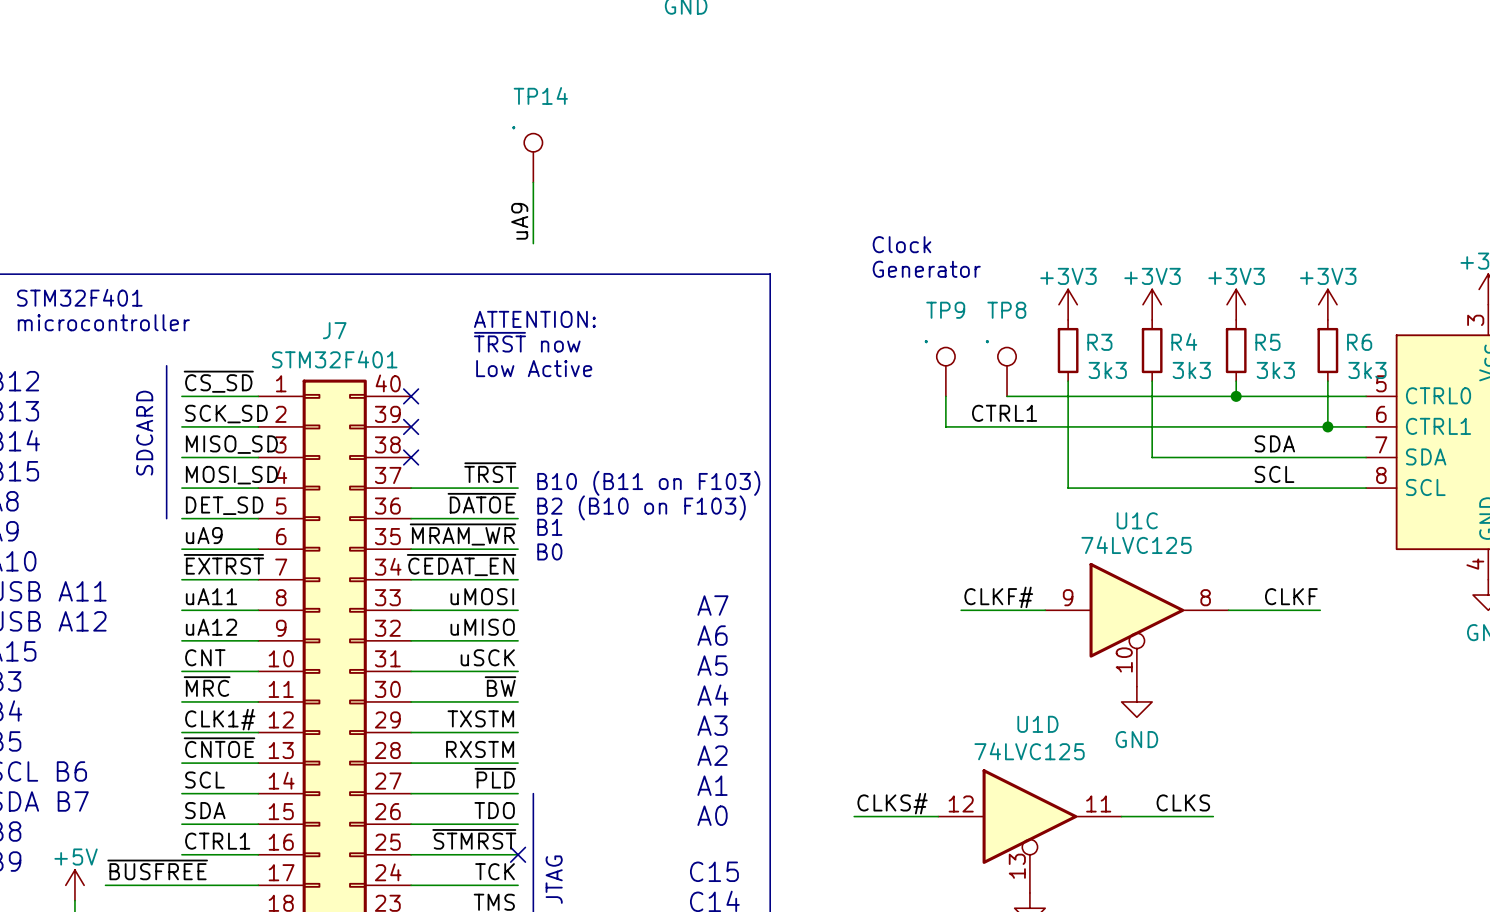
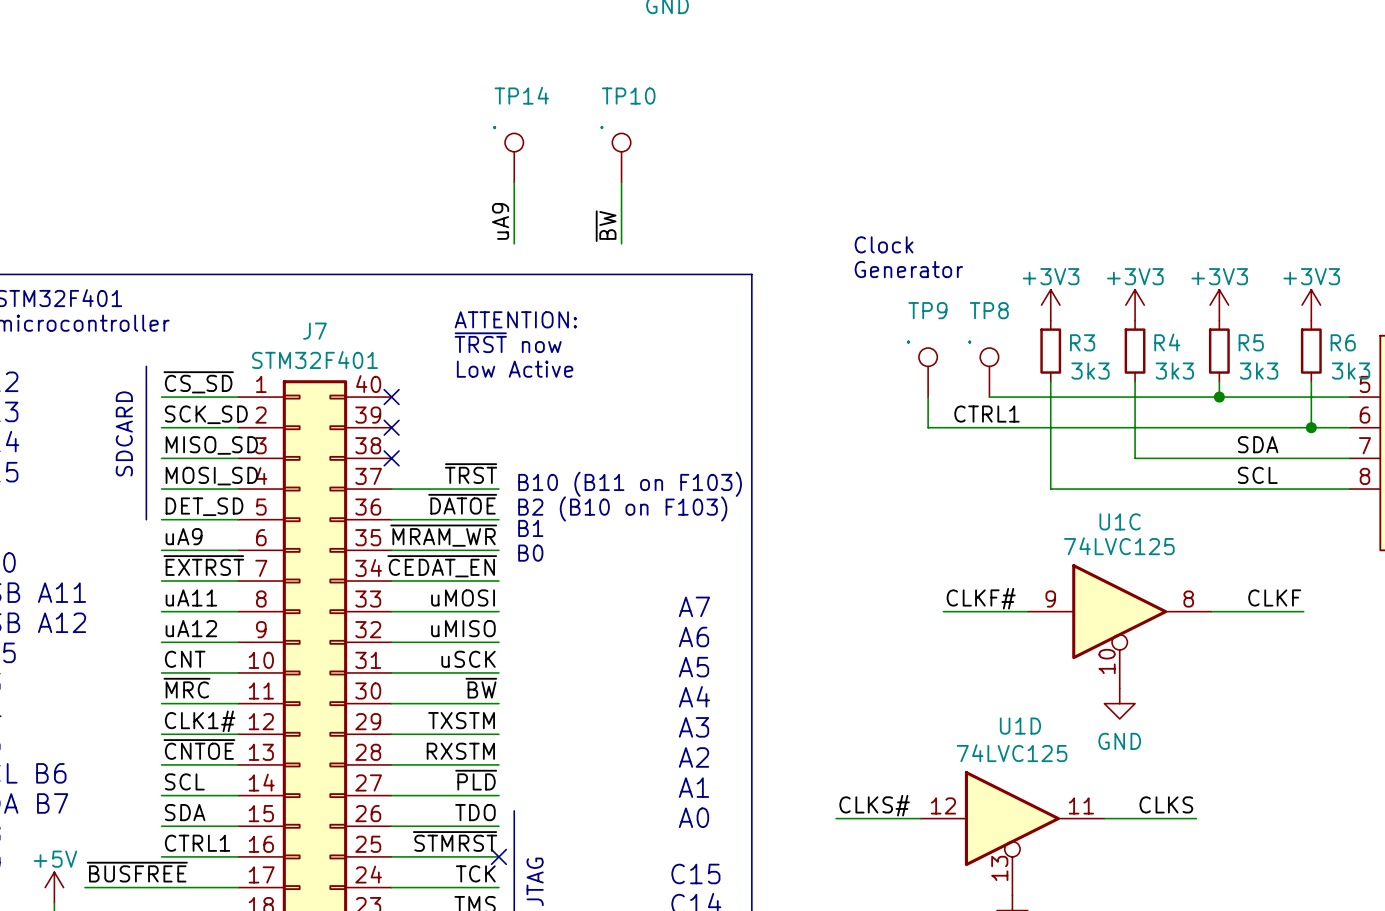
TP10: none -> . (621, 157)
wire: none -> (621, 182) (621, 243)
label: none -> ~{BW} (606, 226)
line: (533, 793) (533, 808) -> none

